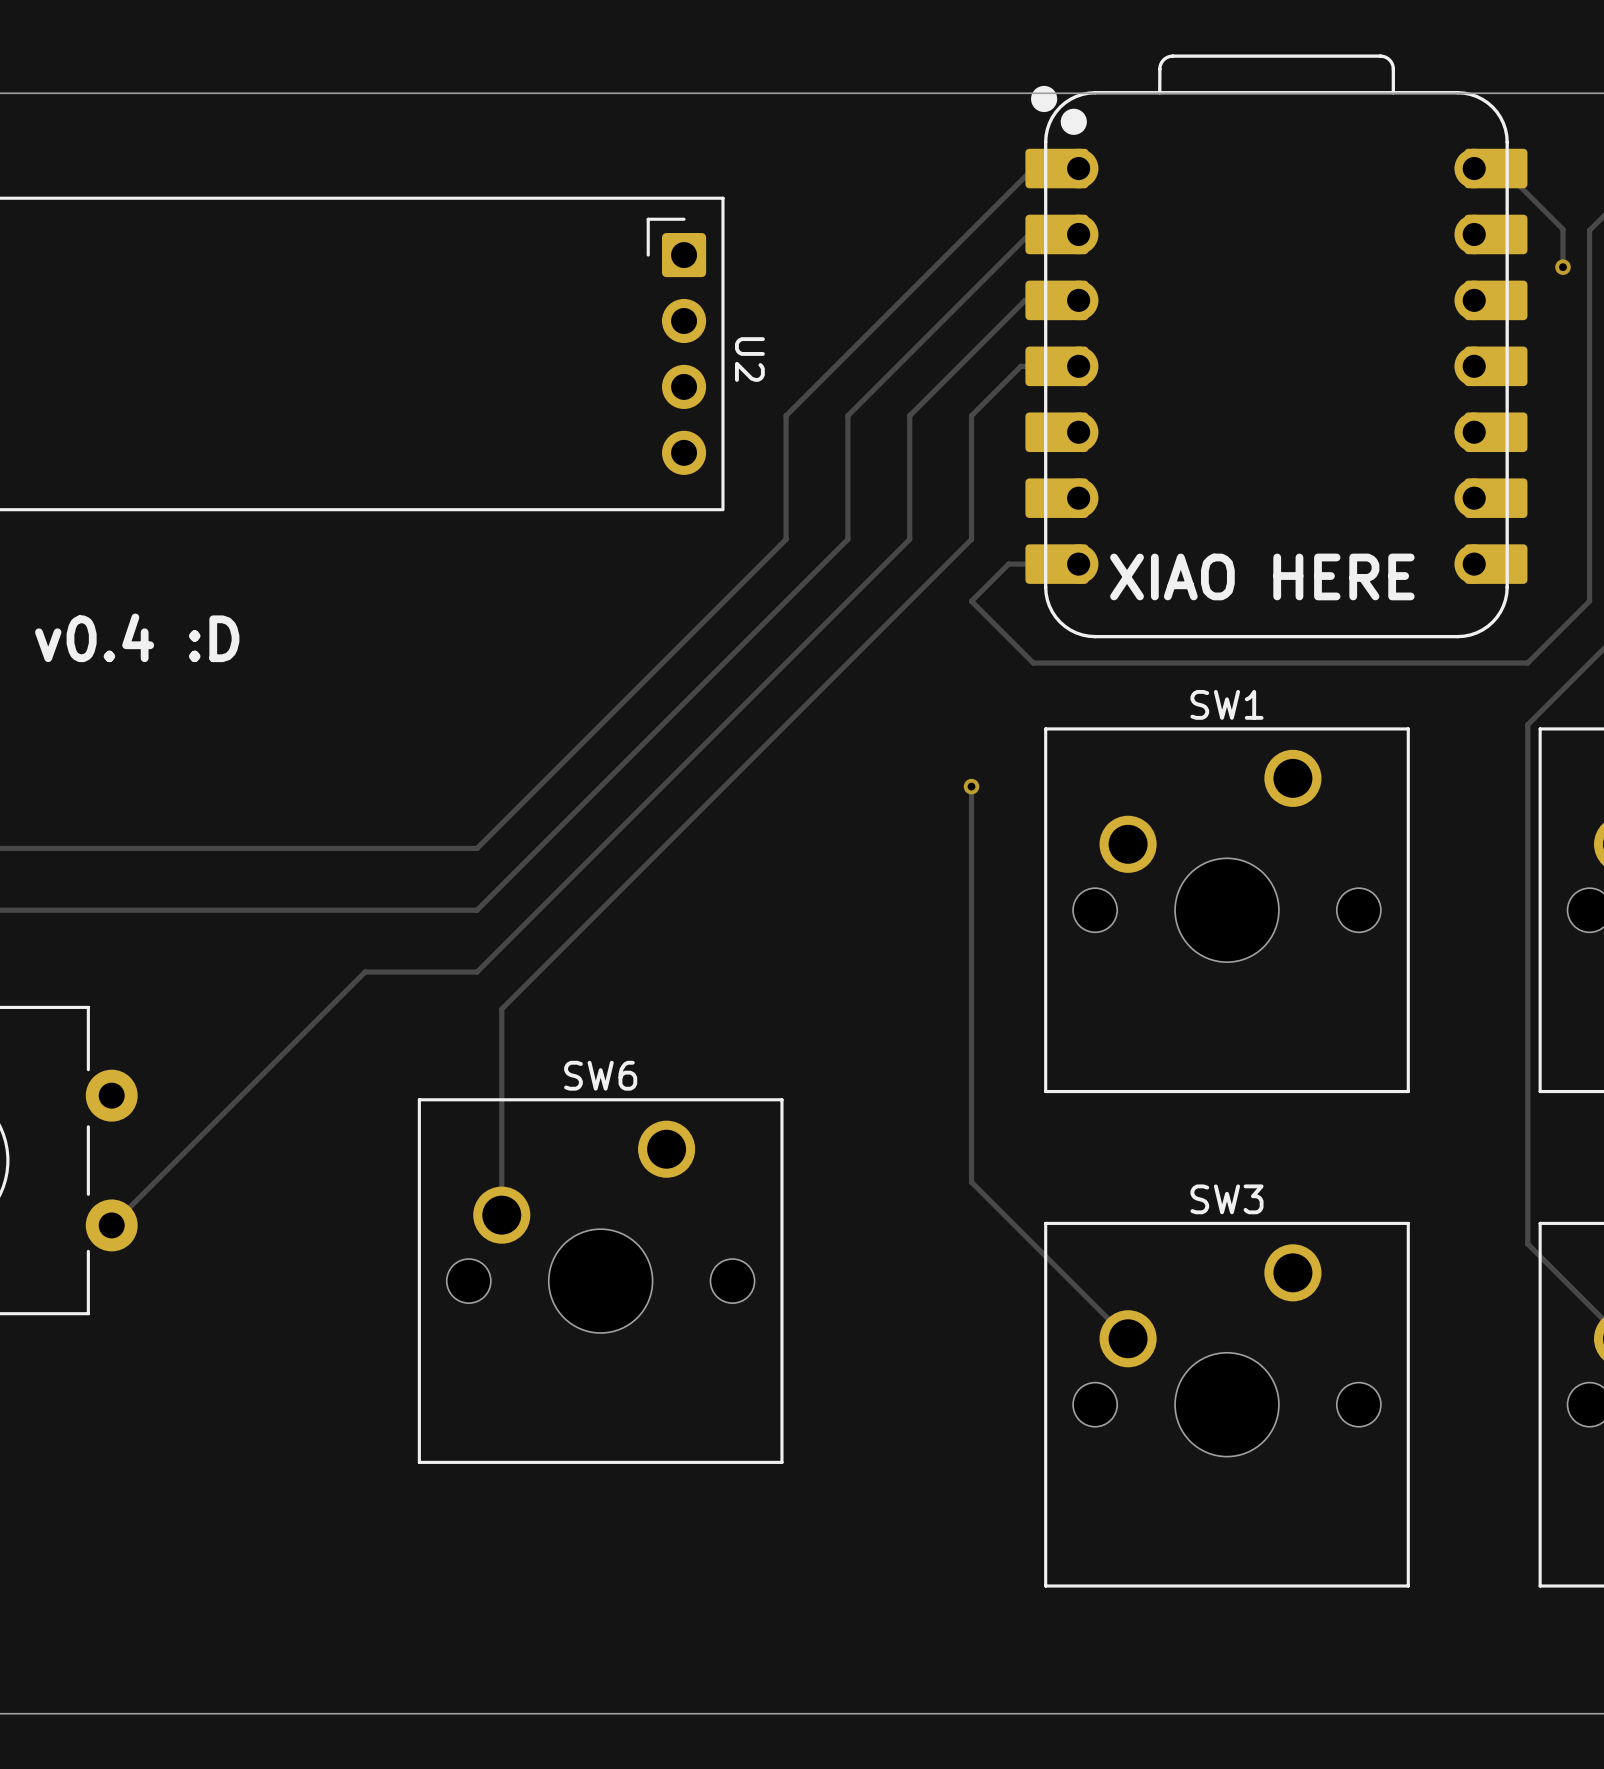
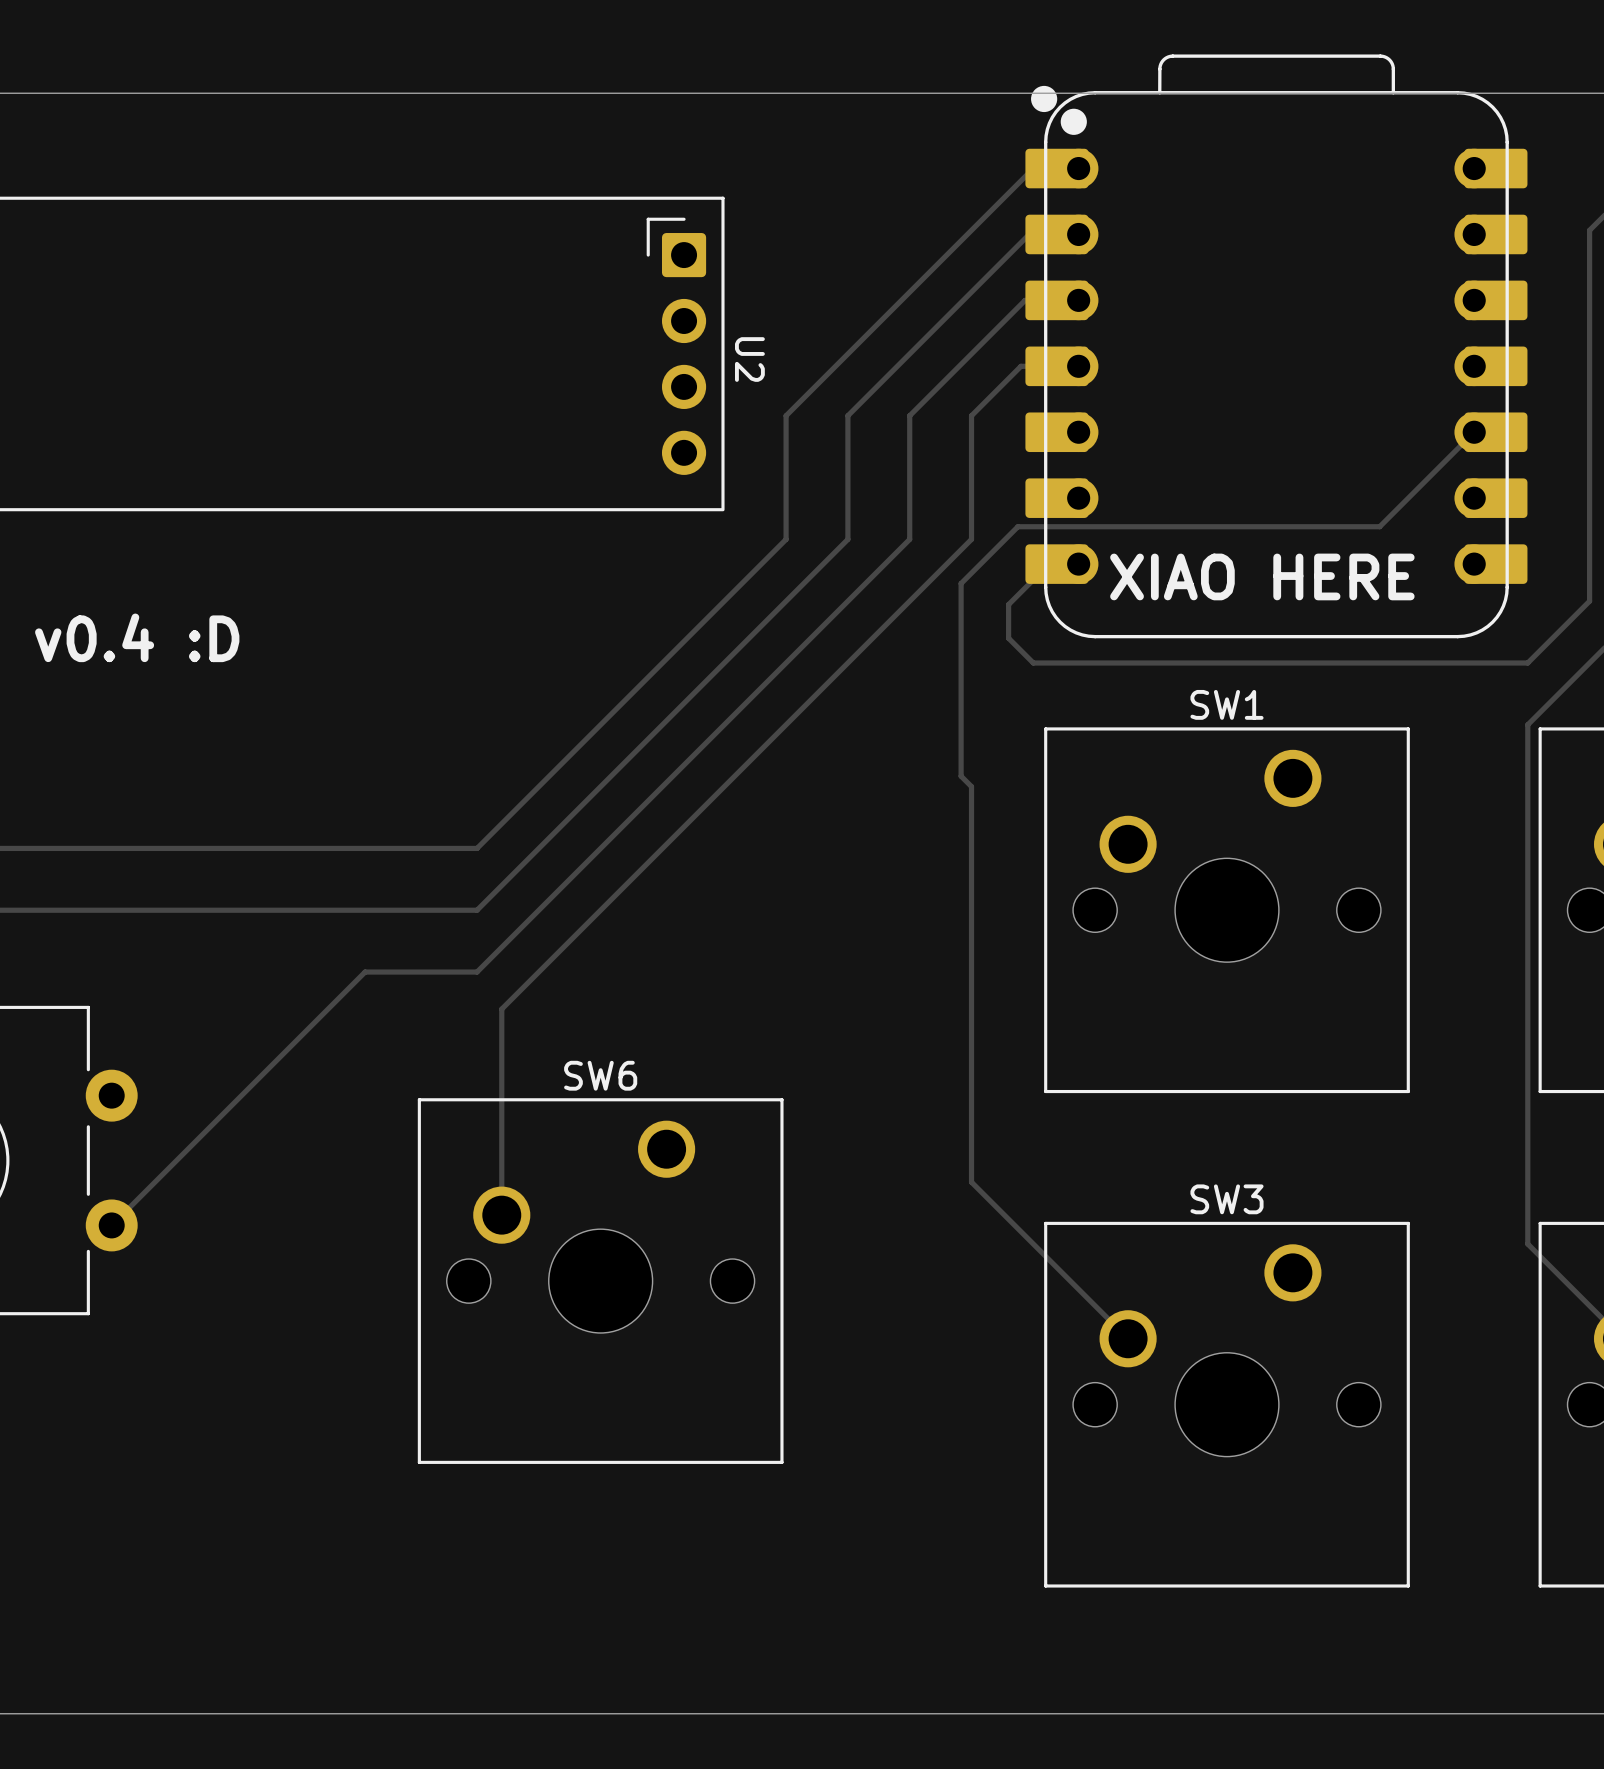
track: (1502, 168) (1562, 229) (1562, 267) -> none
via: (1562, 267) -> none
track: none -> (1474, 432) (1379, 526) (1017, 526) (961, 583) (961, 776) (971, 786)
track: (1049, 564) (1008, 564) (971, 601) (1008, 638) -> (1049, 564) (1008, 604) (1008, 638)
via: (971, 786) -> none

